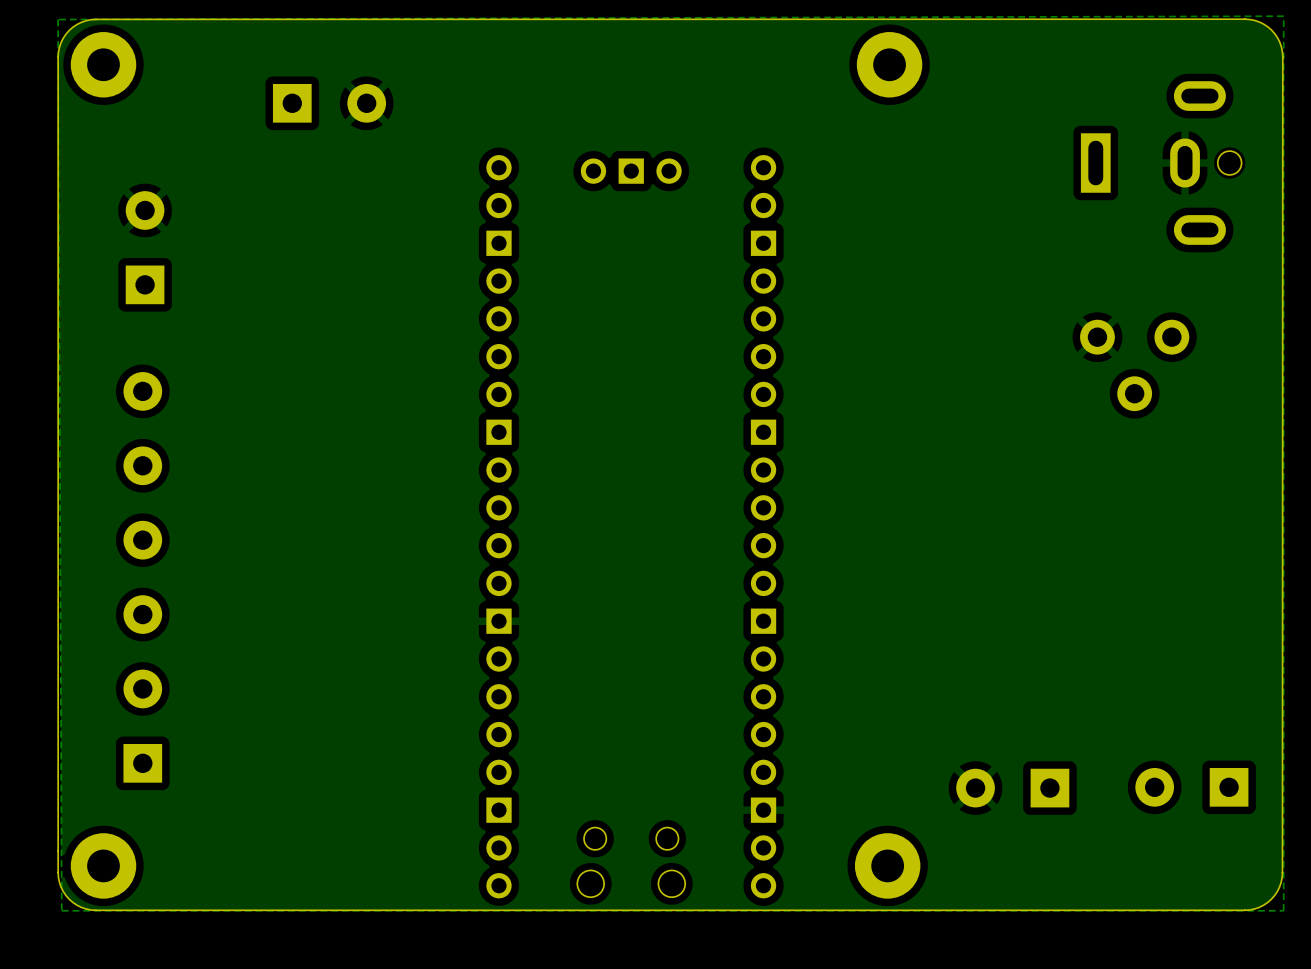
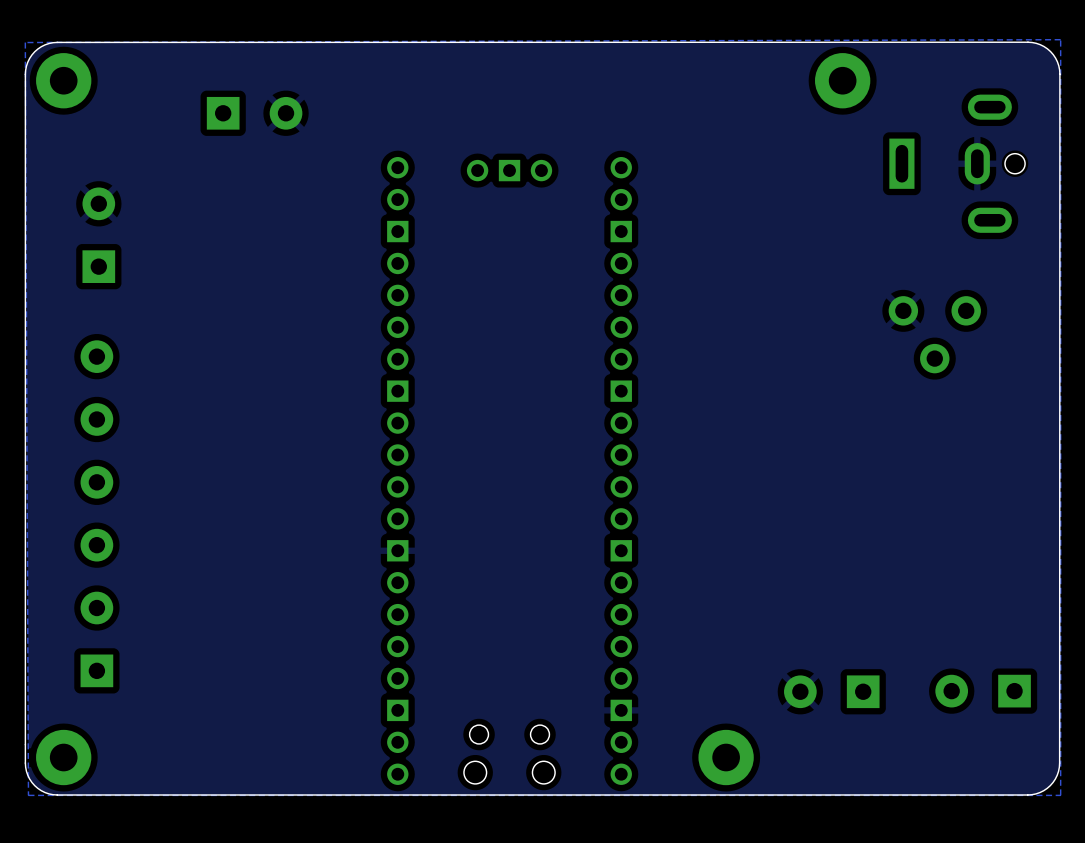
part position: (889, 64) -> (842, 80)

